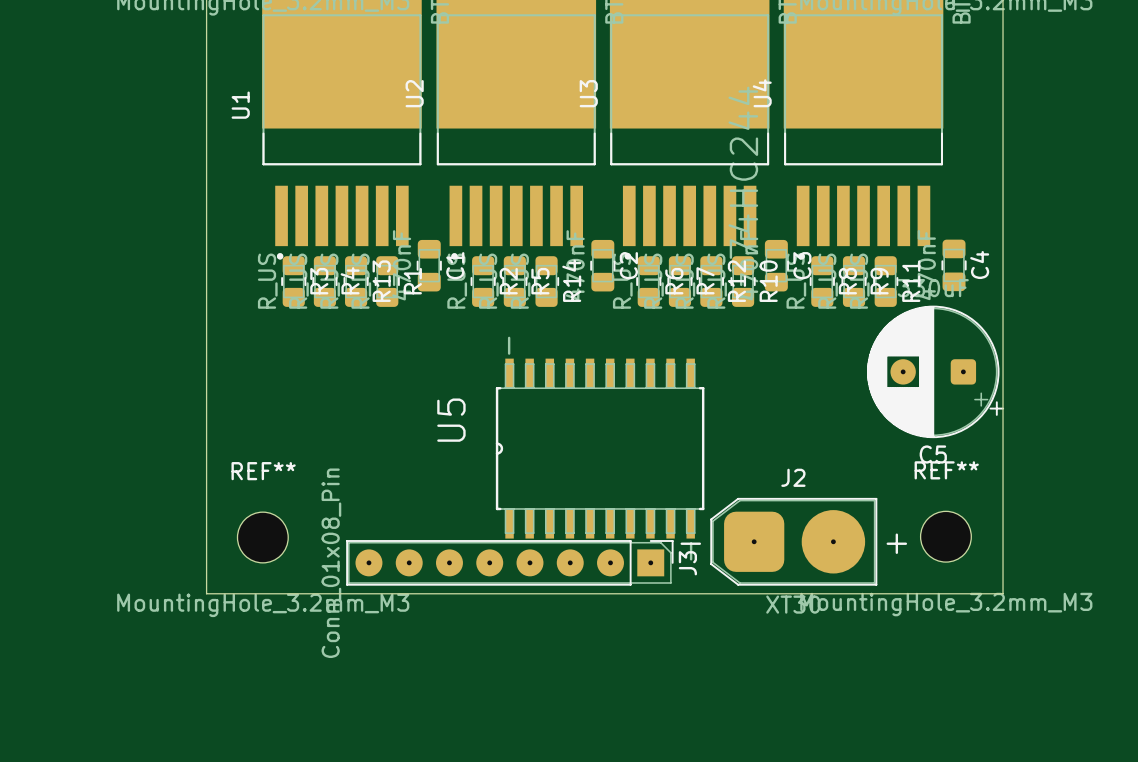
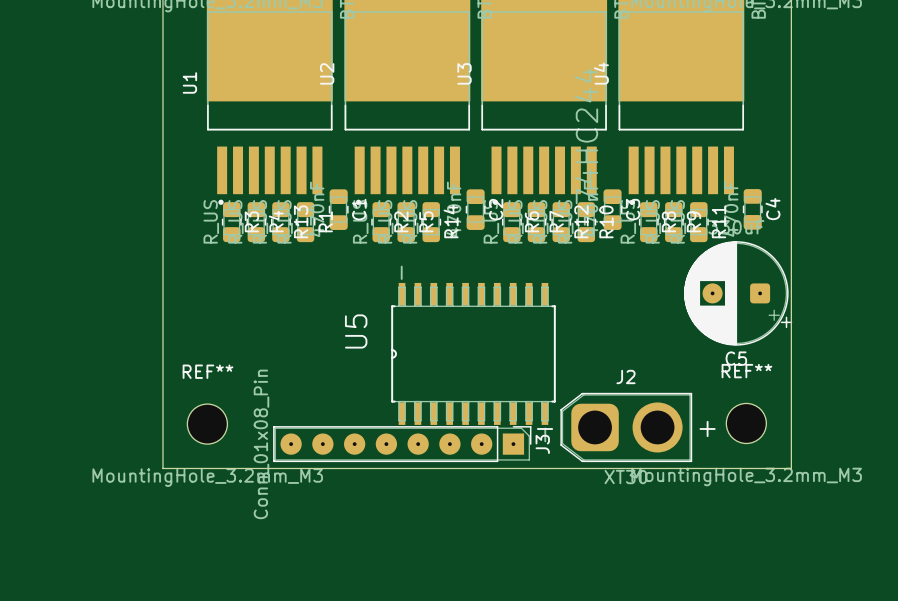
J2 footprint: [710, 497, 878, 586] -> [560, 392, 693, 463]

